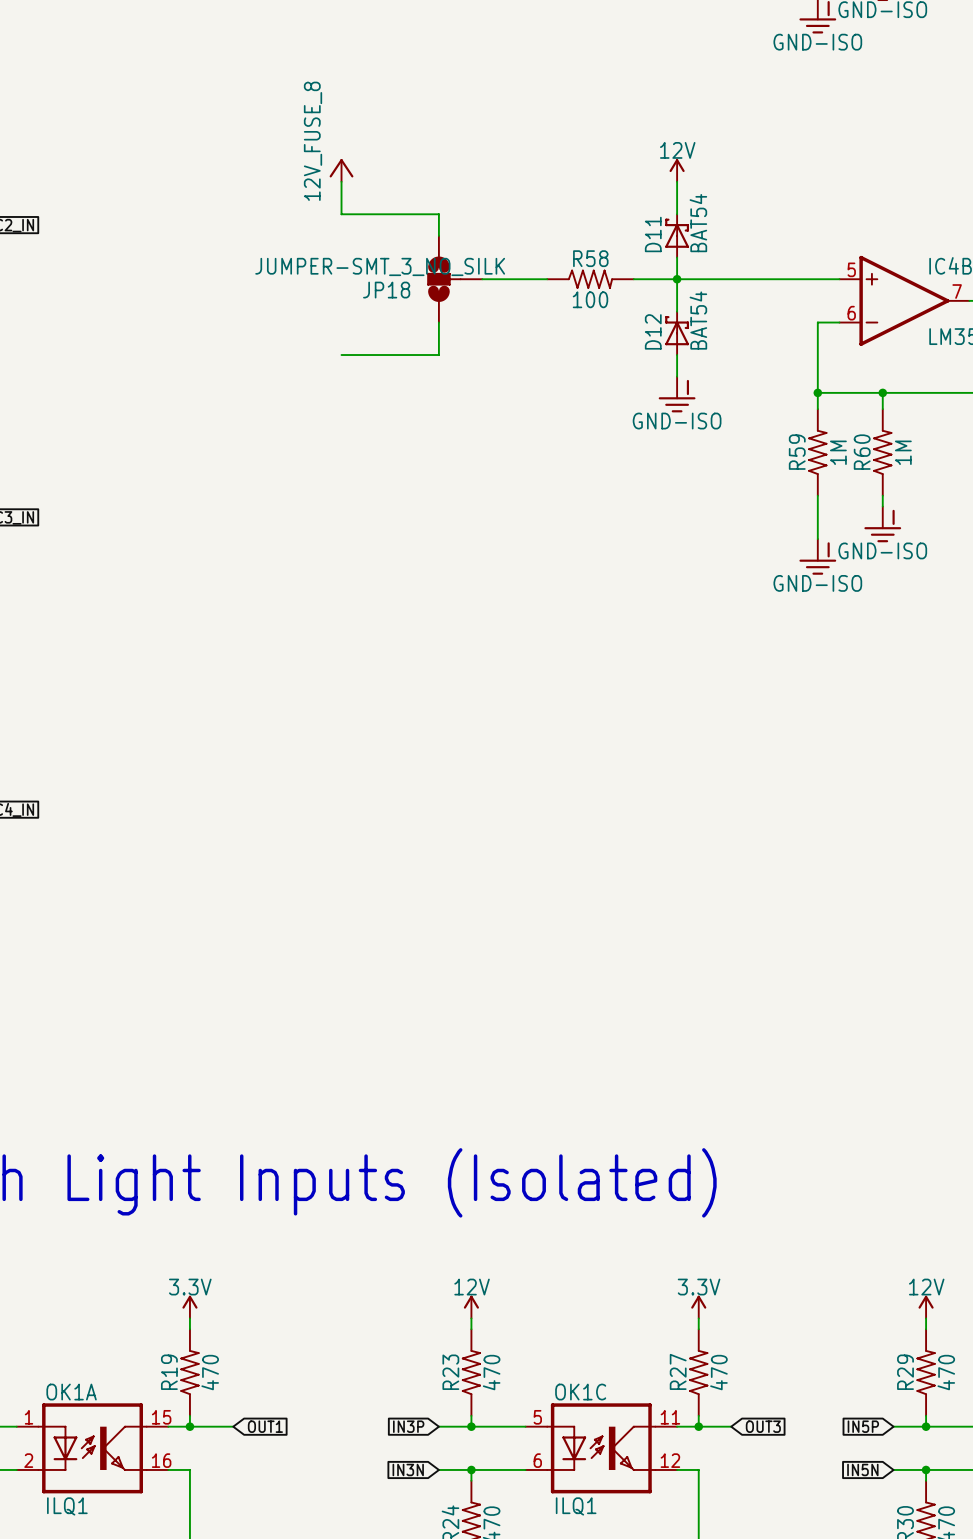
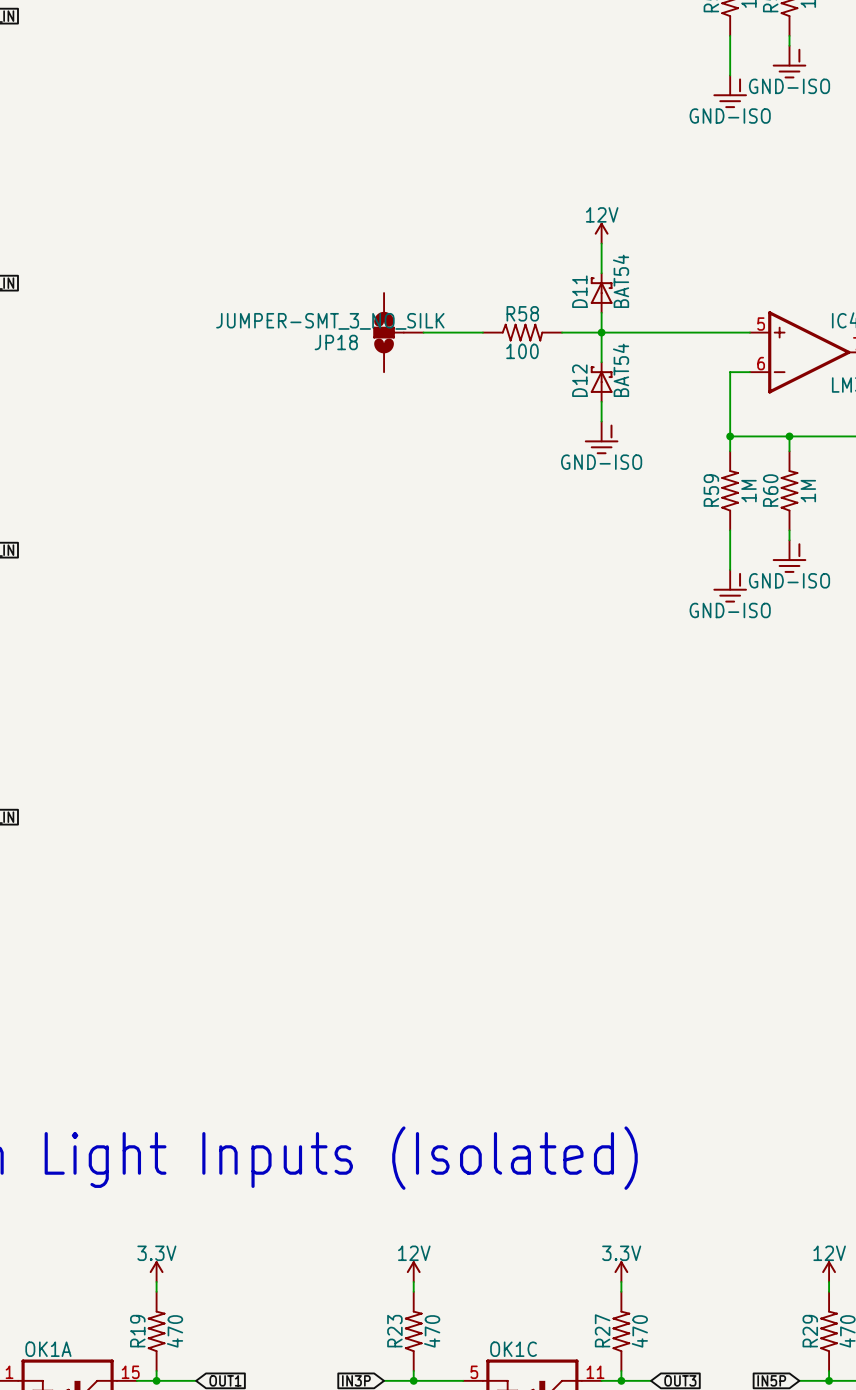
power symbol: 12V_FUSE_8 (341, 170) -> none
wire: (341, 181) (341, 214) (438, 214) (438, 235) -> none
wire: (438, 322) (438, 355) (341, 355) -> none

